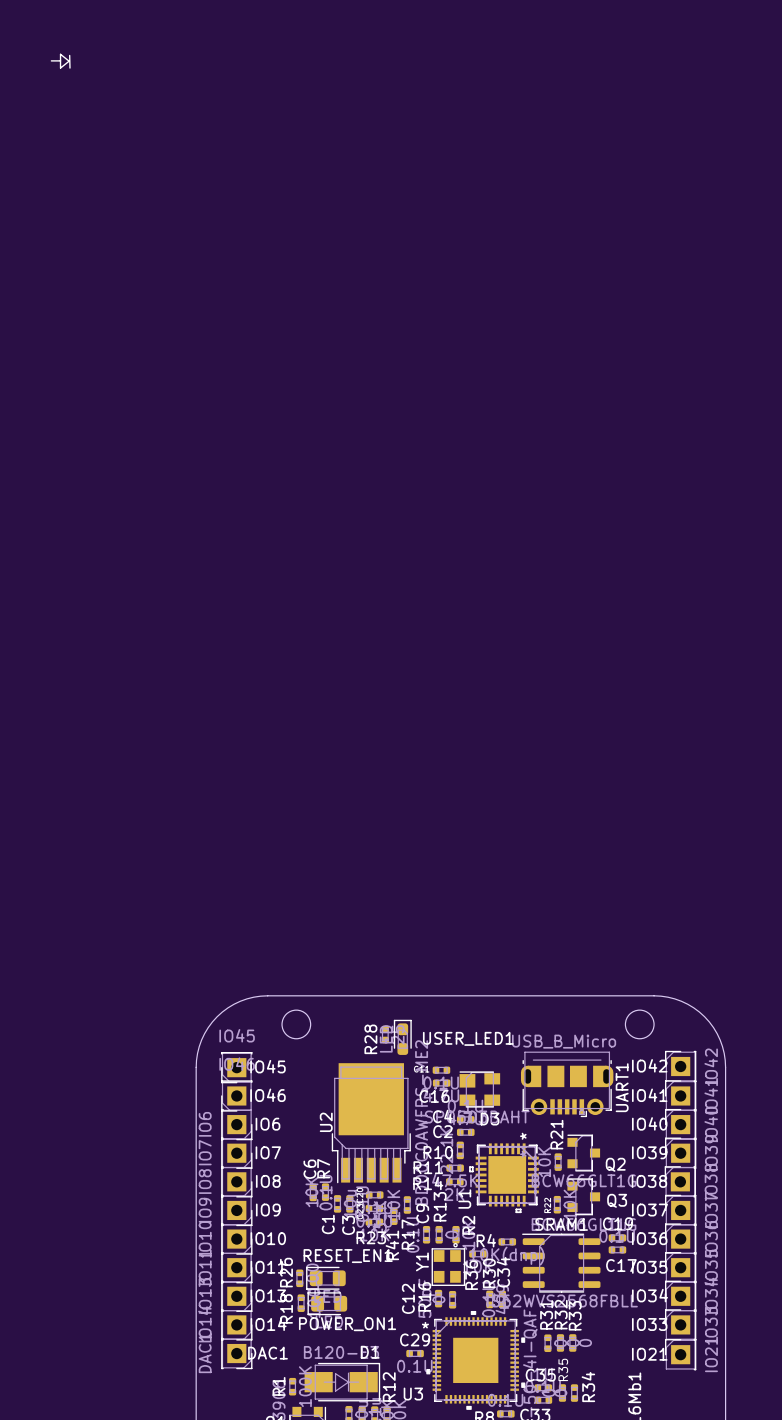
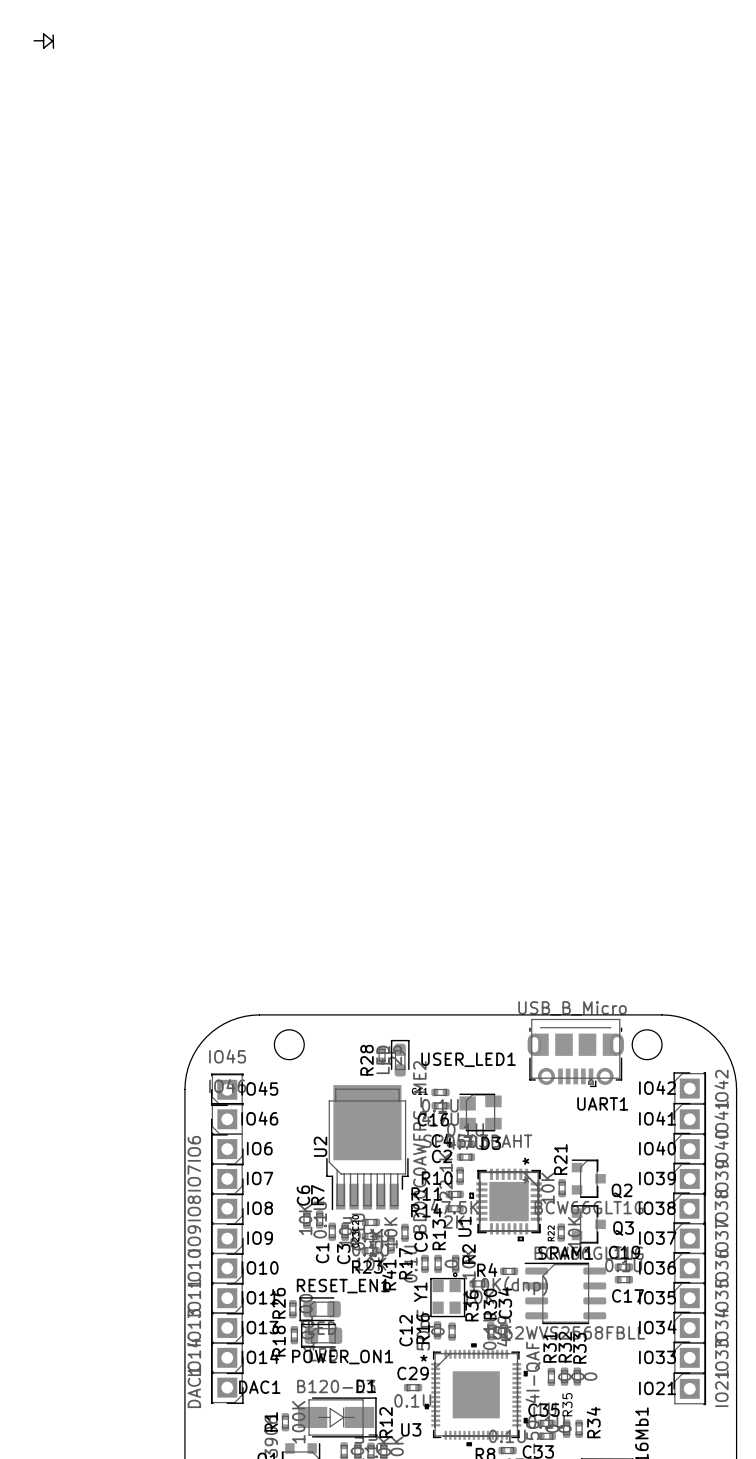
UART1 position: (567, 1084) -> (575, 1053)
UART1 name rotation: 0° (622, 1087) -> 90° clockwise (602, 1103)

